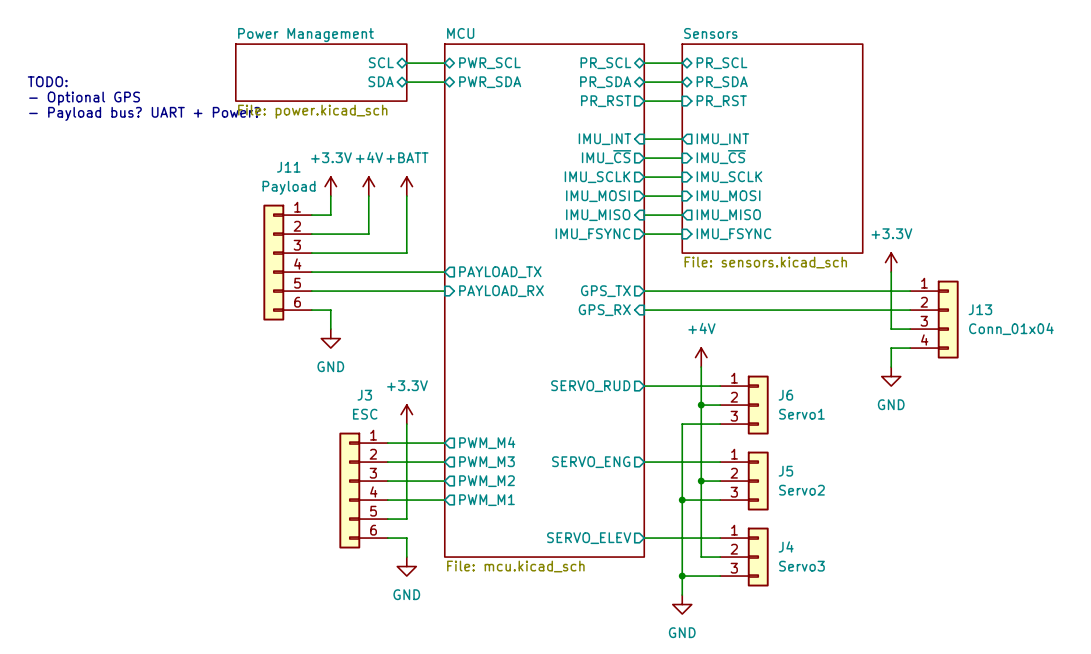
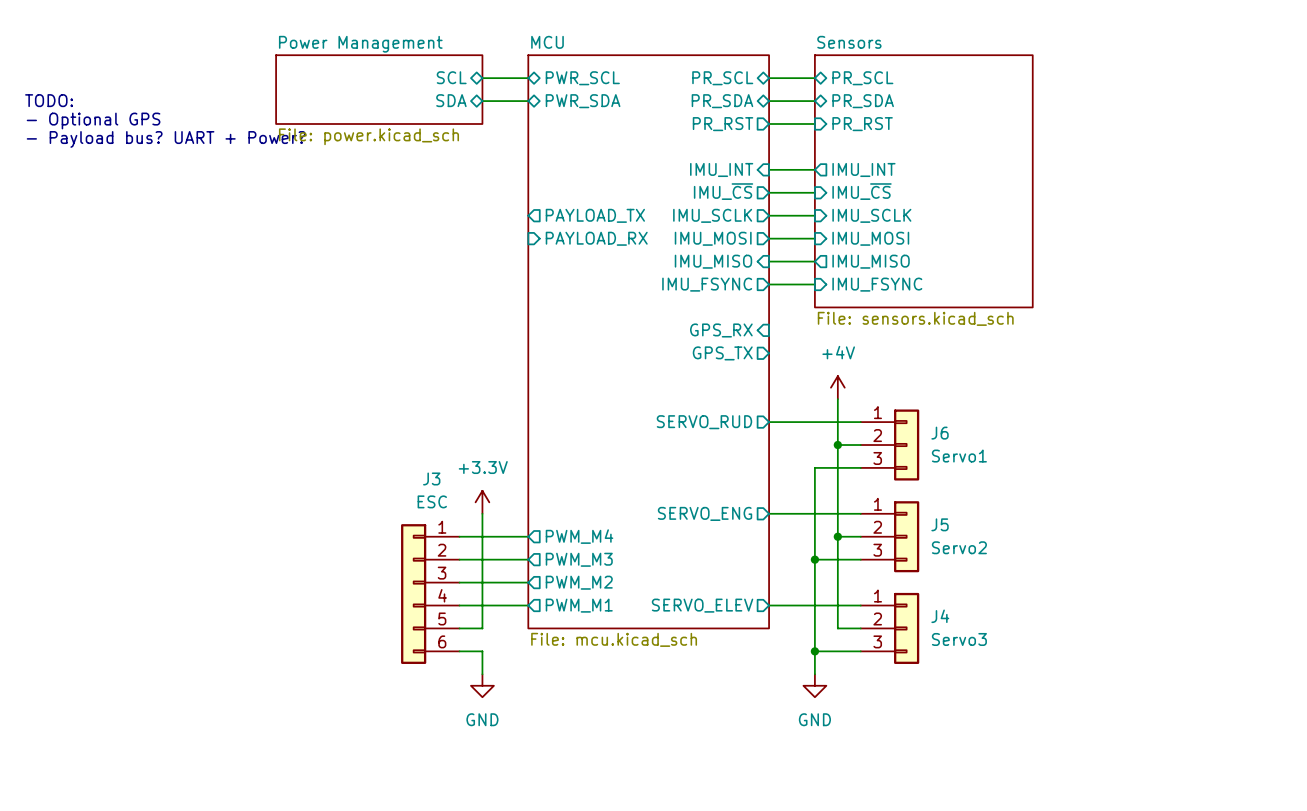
power symbol: +3.3V (330, 186) -> none
power symbol: +4V (368, 186) -> none
power symbol: +BATT (406, 186) -> none
wire: (330, 196) (330, 215) (311, 215) -> none
wire: (368, 196) (368, 234) (311, 234) -> none
wire: (406, 196) (406, 253) (311, 253) -> none
J11: Payload (287, 262) -> none
power symbol: +3.3V (891, 262) -> none
wire: (311, 272) (444, 272) -> none
sheet pin position: PAYLOAD_TX (500, 272) -> PAYLOAD_TX (595, 215)
wire: (891, 272) (891, 329) (910, 329) -> none
sheet MCU: none -> File: mcu.kicad_sch (648, 341)
wire: (311, 291) (444, 291) -> none
sheet pin position: PAYLOAD_RX (501, 291) -> PAYLOAD_RX (596, 238)
wire: (644, 291) (910, 291) -> none
sheet MCU: File: mcu.kicad_sch (544, 300) -> none
wire: (311, 310) (330, 310) (330, 329) -> none
sheet pin position: GPS_RX (604, 310) -> GPS_RX (721, 330)
wire: (644, 310) (910, 310) -> none
J13: Conn_01x04 (934, 319) -> none
wire: none -> (837, 399) (837, 445) (860, 445)
power symbol: GND (330, 338) -> none
wire: none -> (769, 422) (860, 422)
wire: (910, 348) (891, 348) (891, 367) -> none
power symbol position: +4V (701, 357) -> +4V (837, 387)
junction: none -> (837, 445)
power symbol: GND (891, 376) -> none
sheet pin position: SERVO_RUD (590, 386) -> SERVO_RUD (704, 422)
wire: (644, 386) (682, 386) -> (769, 513) (814, 513) (814, 467)
wire: (701, 405) (720, 405) -> (837, 536) (860, 536)
junction: (701, 405) -> none
J6 position: (744, 405) -> (890, 445)
junction: none -> (837, 536)
sheet pin position: SERVO_ENG (591, 462) -> SERVO_ENG (705, 513)
wire: (644, 462) (682, 462) -> (769, 605) (814, 605)
junction: none -> (814, 559)
wire: (701, 481) (720, 481) -> none
junction: (701, 481) -> none
J5 position: (744, 481) -> (890, 536)
junction: (682, 500) -> none
wire: (701, 519) (701, 557) (720, 557) -> (837, 628) (860, 628)
sheet pin position: SERVO_ELEV (589, 538) -> SERVO_ELEV (702, 605)
wire: (644, 538) (682, 538) -> none
junction: none -> (814, 651)
wire: (682, 557) (682, 595) -> none
J4 position: (744, 557) -> (890, 628)
wire: (682, 576) (720, 576) -> none
junction: (682, 576) -> none
power symbol position: GND (682, 604) -> GND (814, 685)

